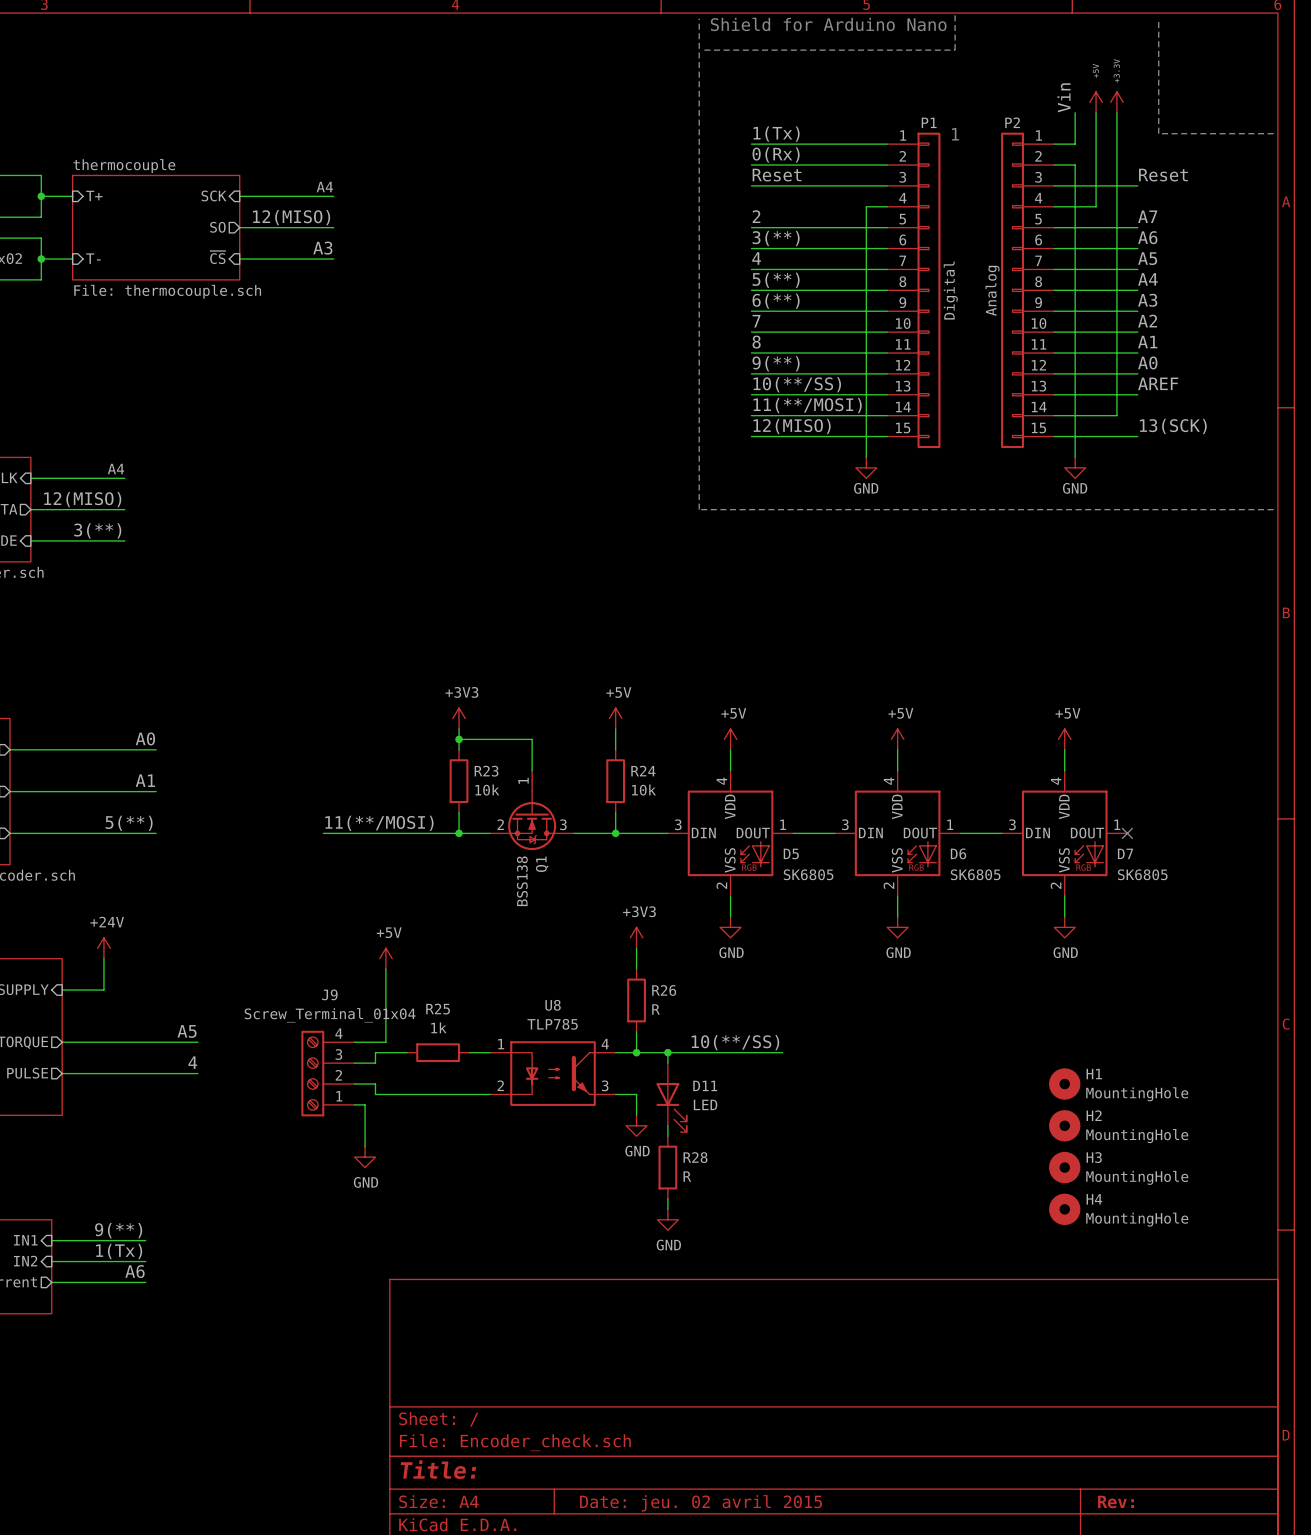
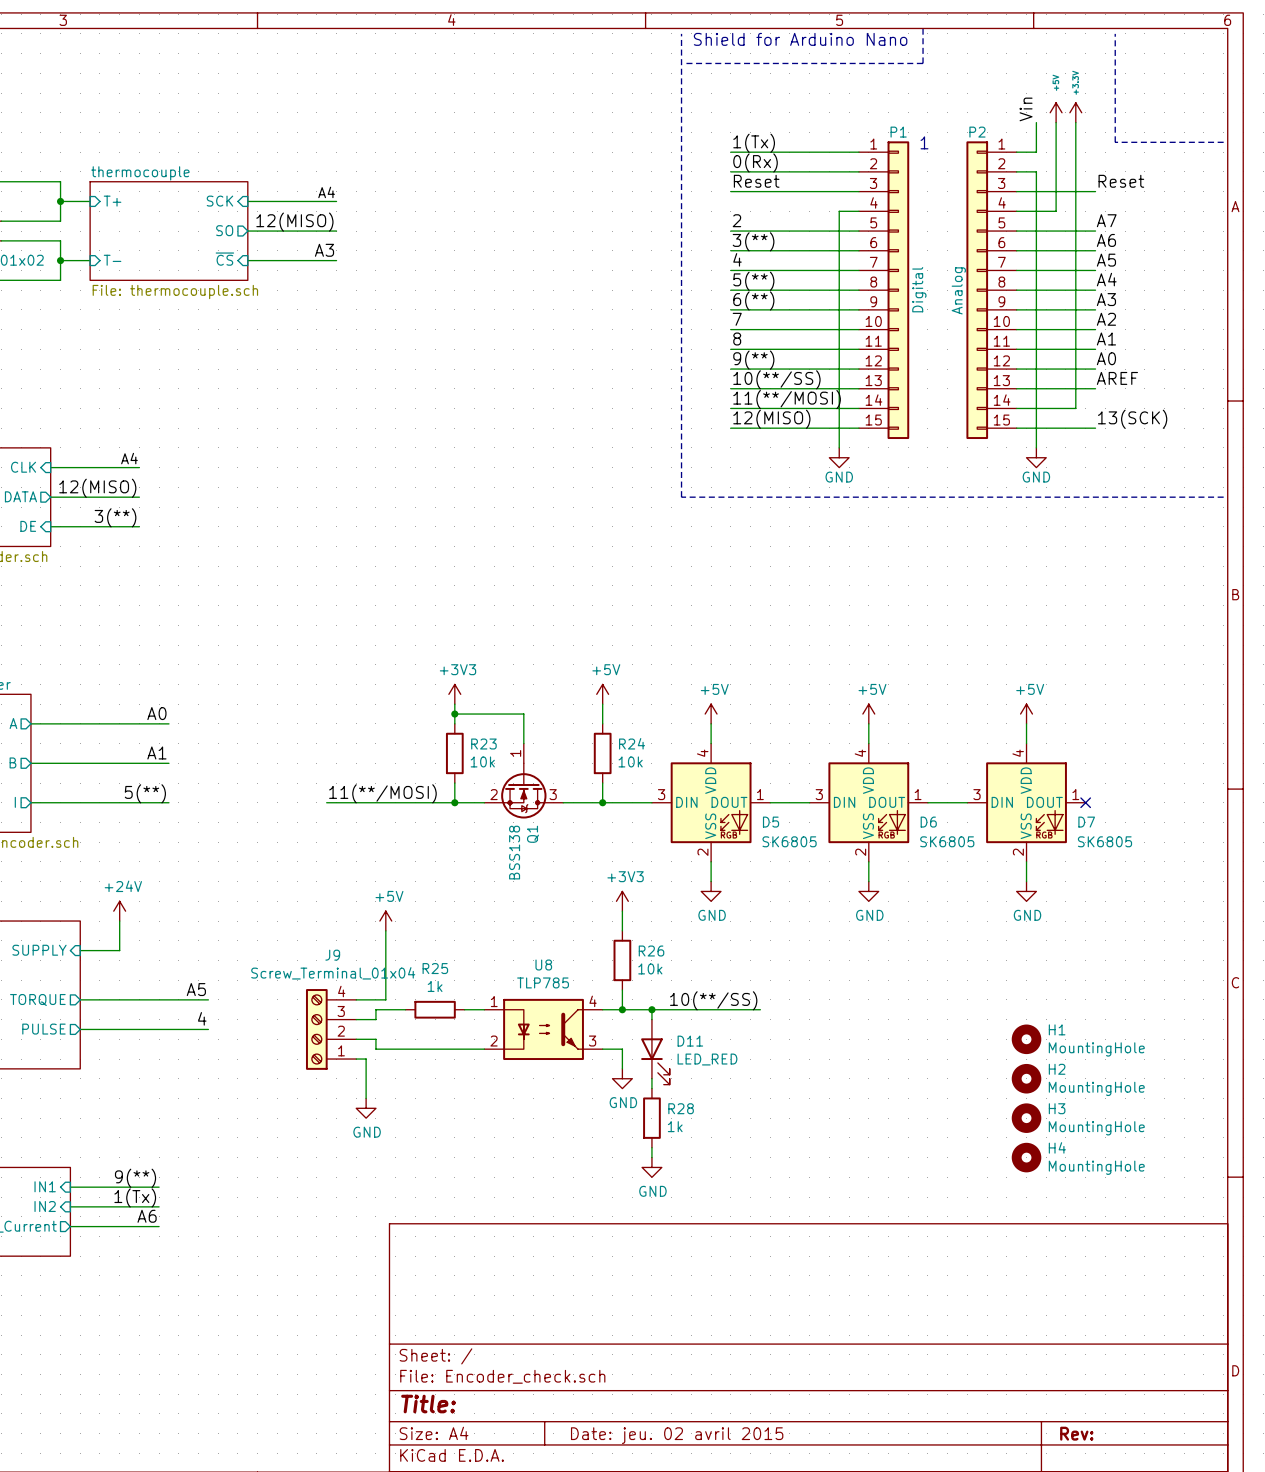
R26 value: R (655, 1009) -> 10k (650, 968)
D11 value: LED (705, 1104) -> LED_RED (707, 1059)
R28 value: R (687, 1176) -> 1k (675, 1126)

